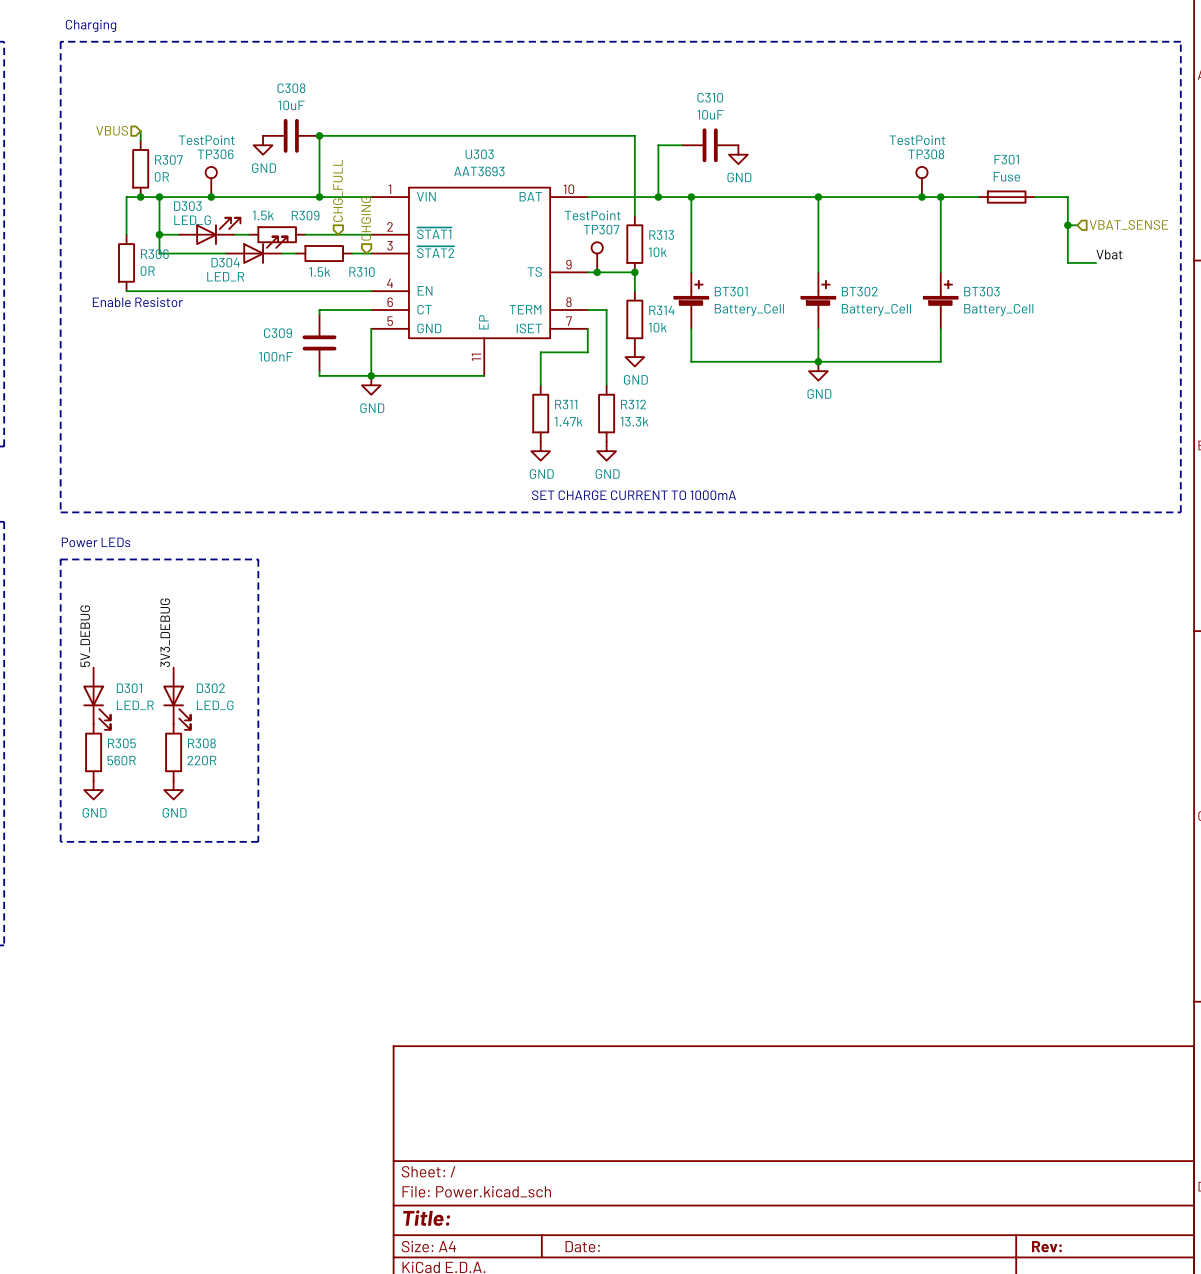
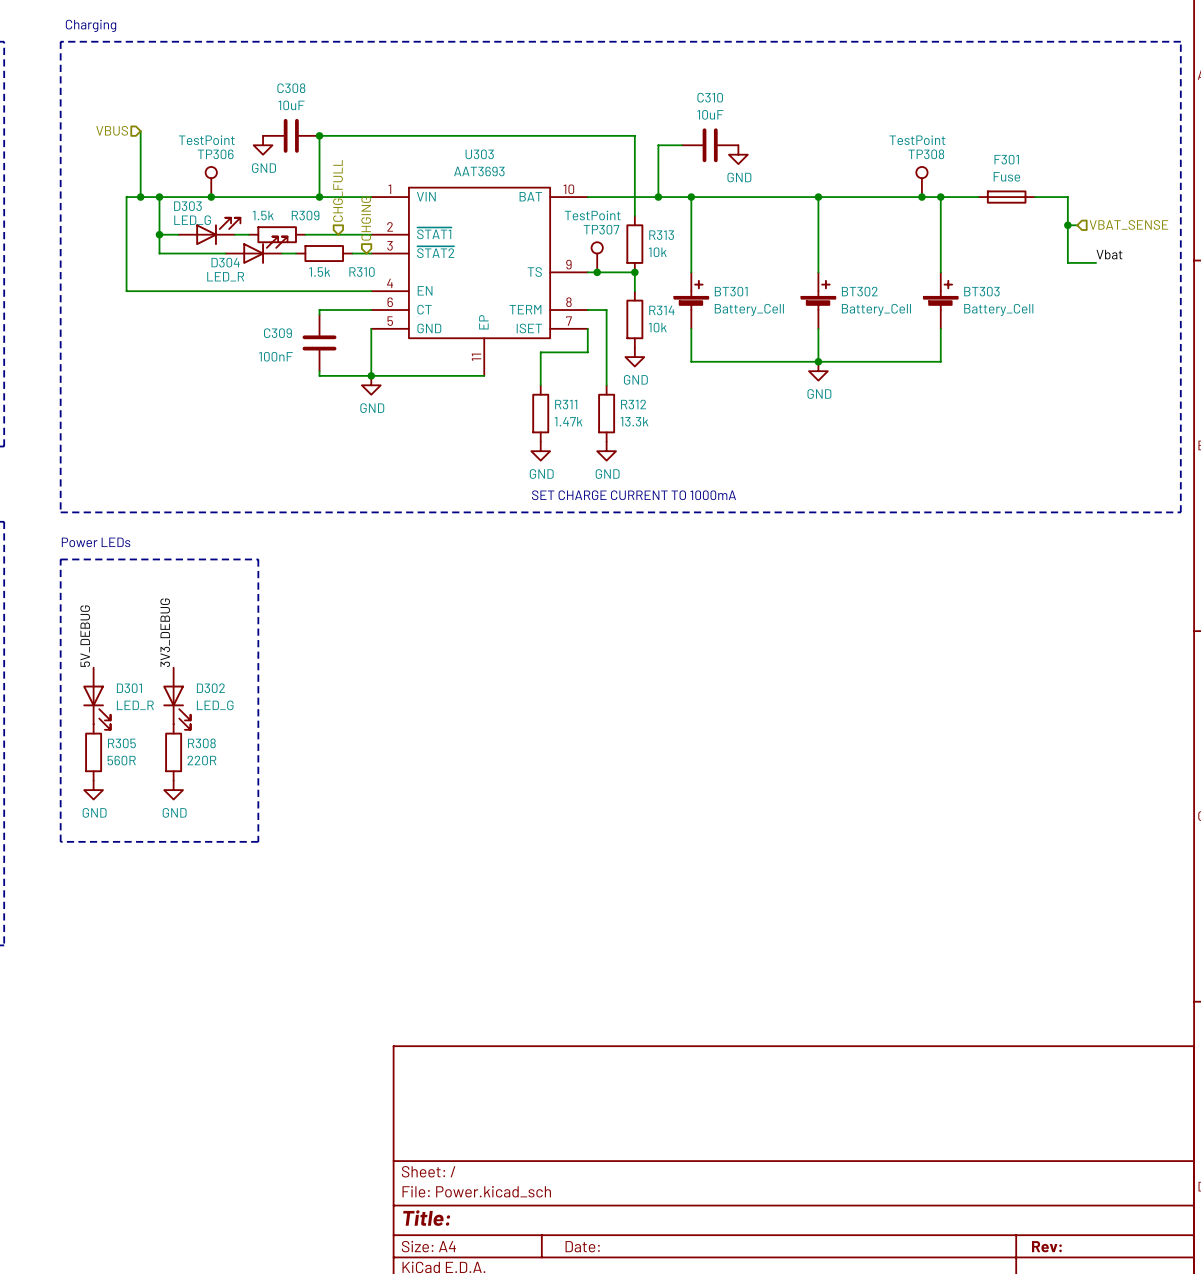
wire: none -> (140, 140) (140, 197)
R307: 0R (140, 168) -> none
wire: none -> (126, 234) (126, 291)
R306: 0R (126, 262) -> none
text: Enable Resistor (137, 302) -> none

